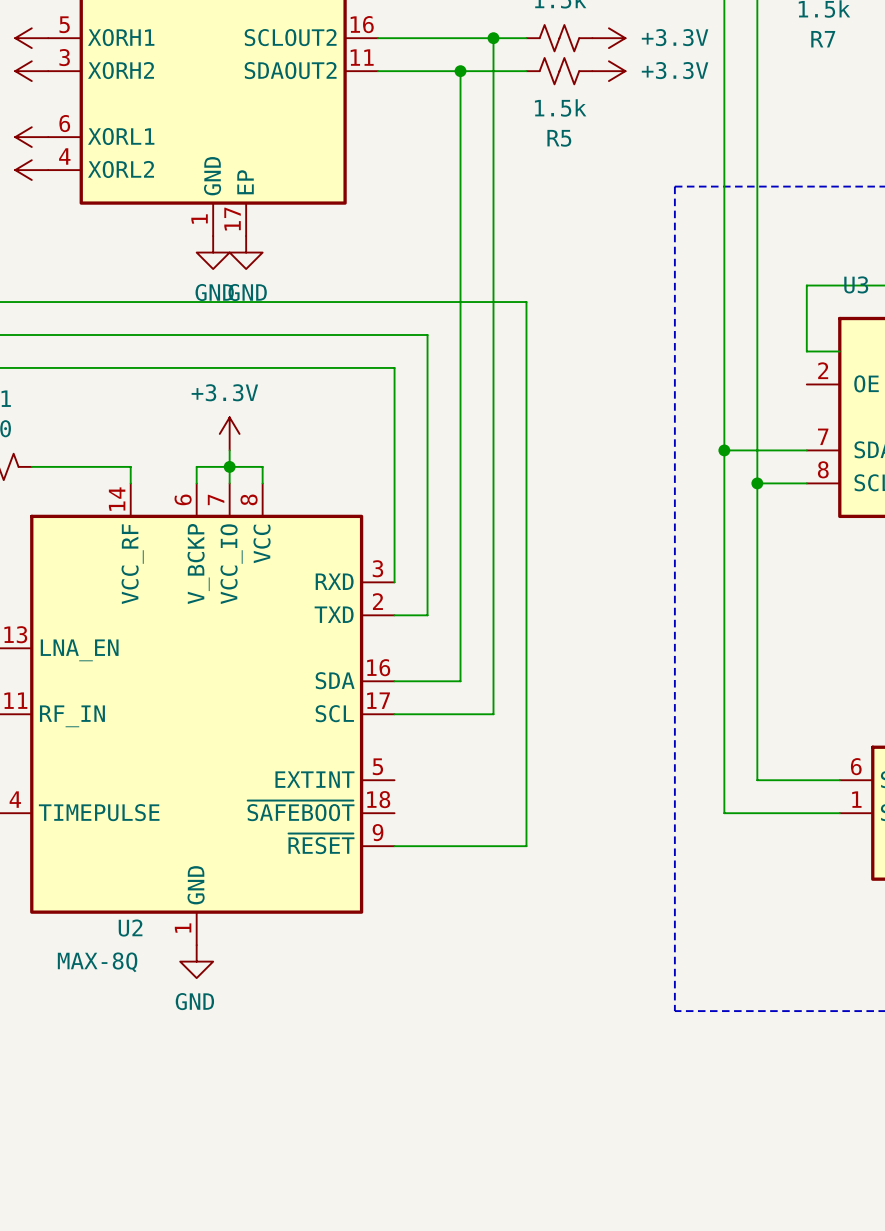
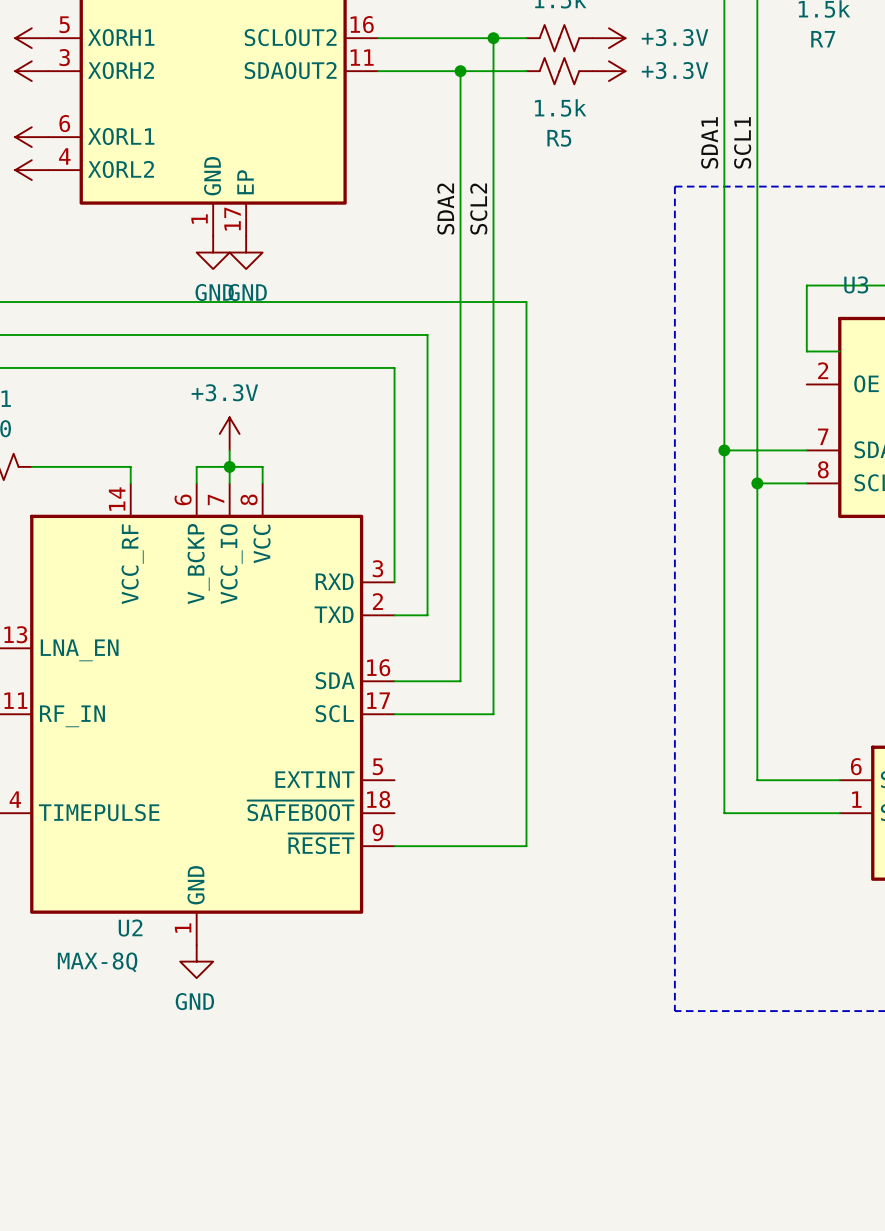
label: none -> SDA1 (709, 142)
label: none -> SCL1 (742, 142)
label: none -> SDA2 (445, 209)
label: none -> SCL2 (478, 209)

